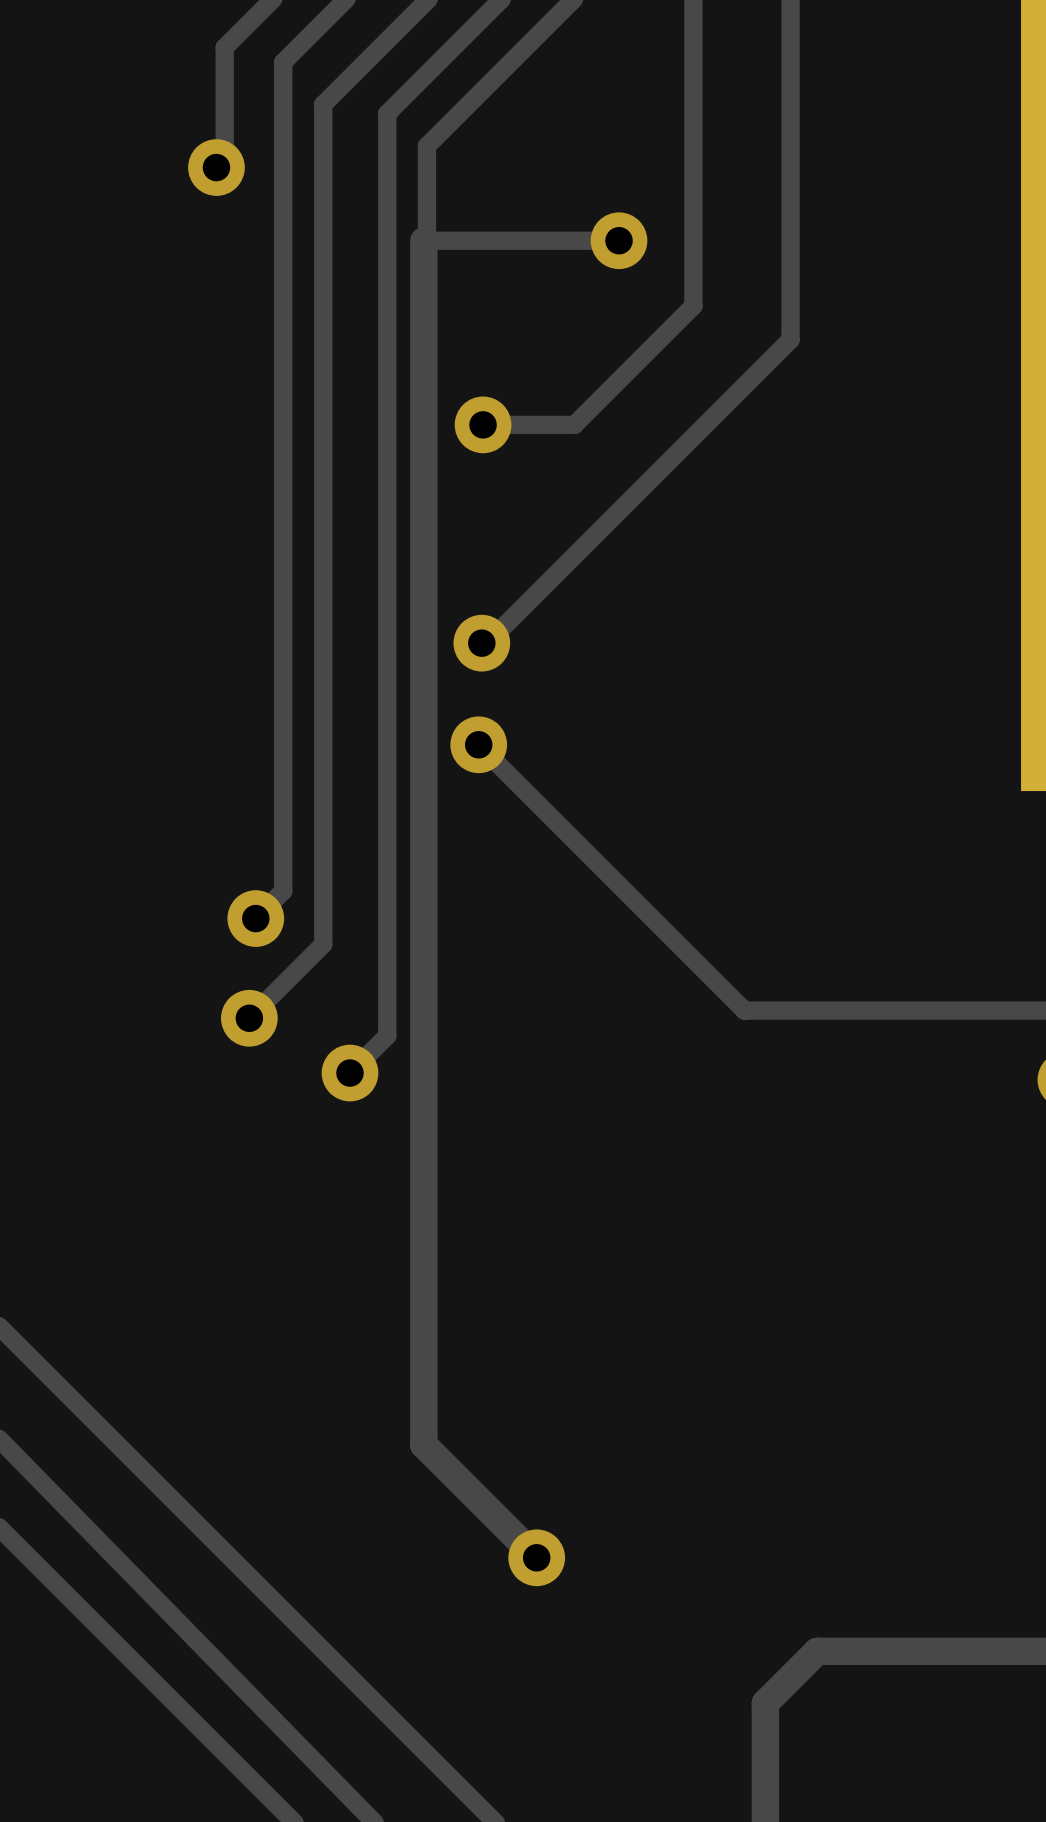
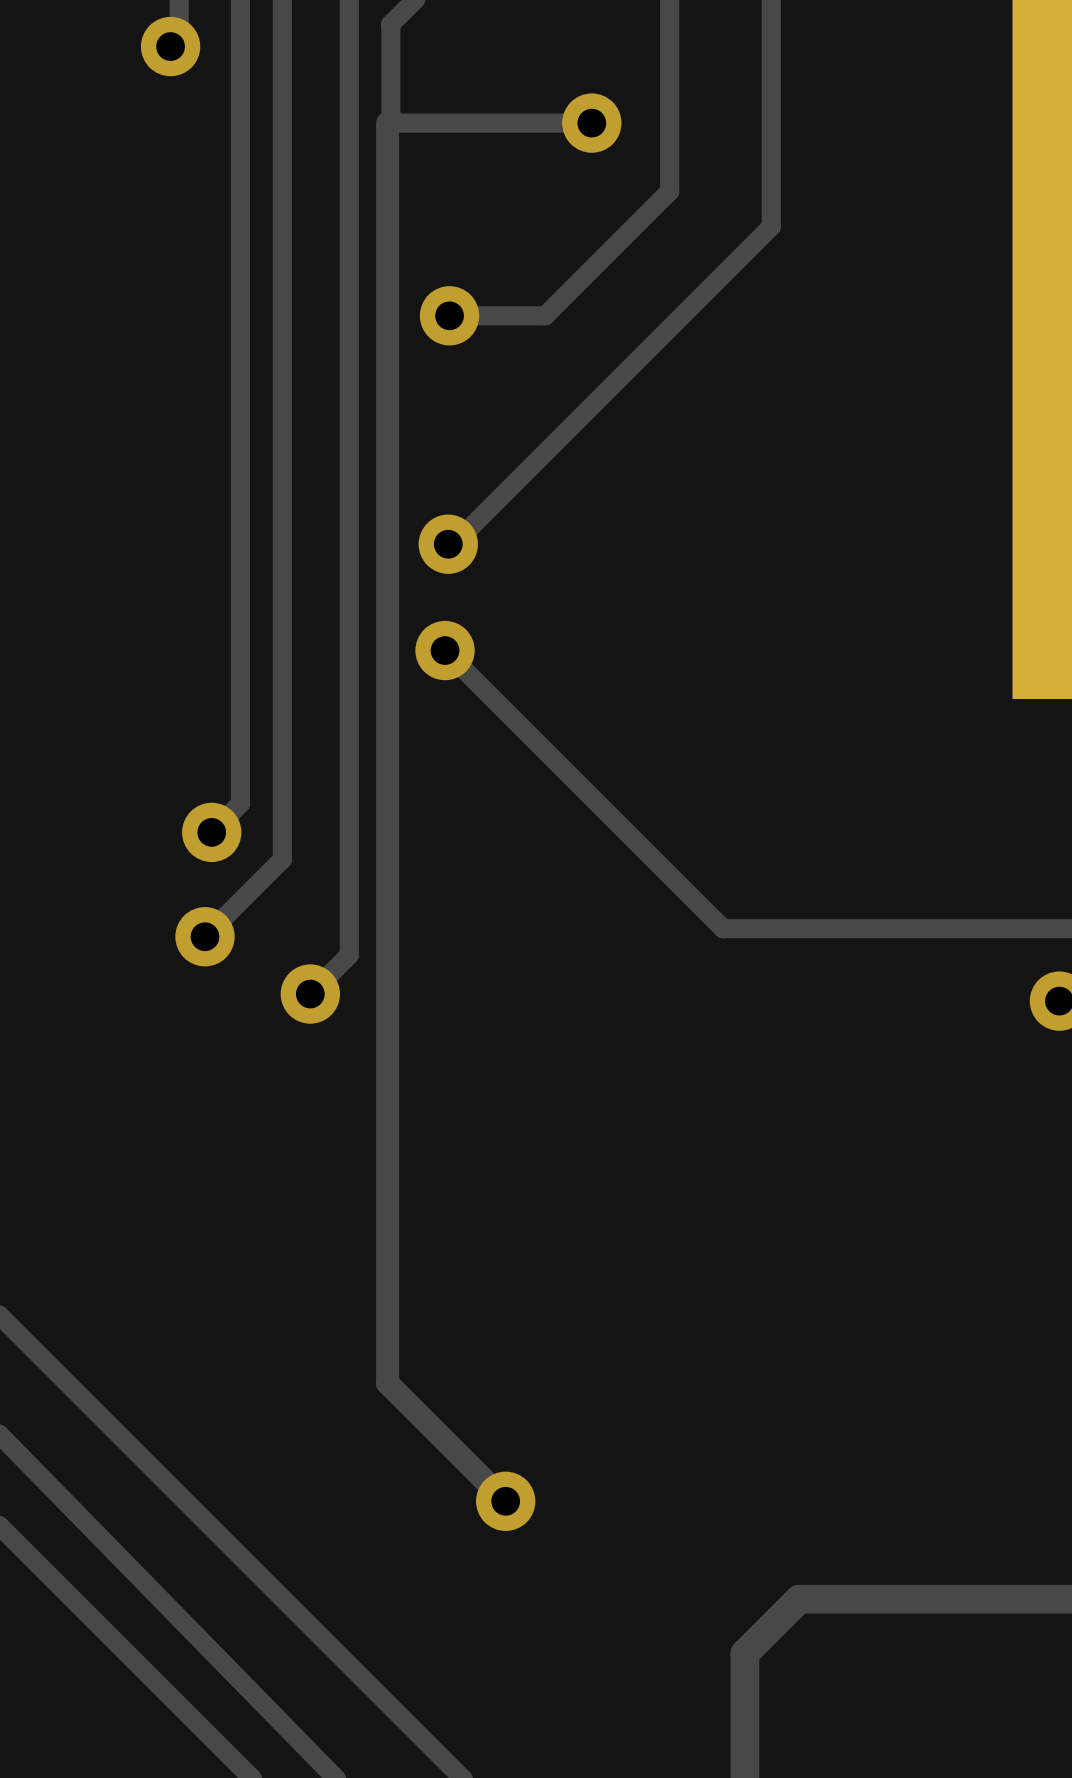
track width: thick (423, 240) (423, 1444) (536, 1557) -> thin (387, 123) (387, 1383) (505, 1501)

